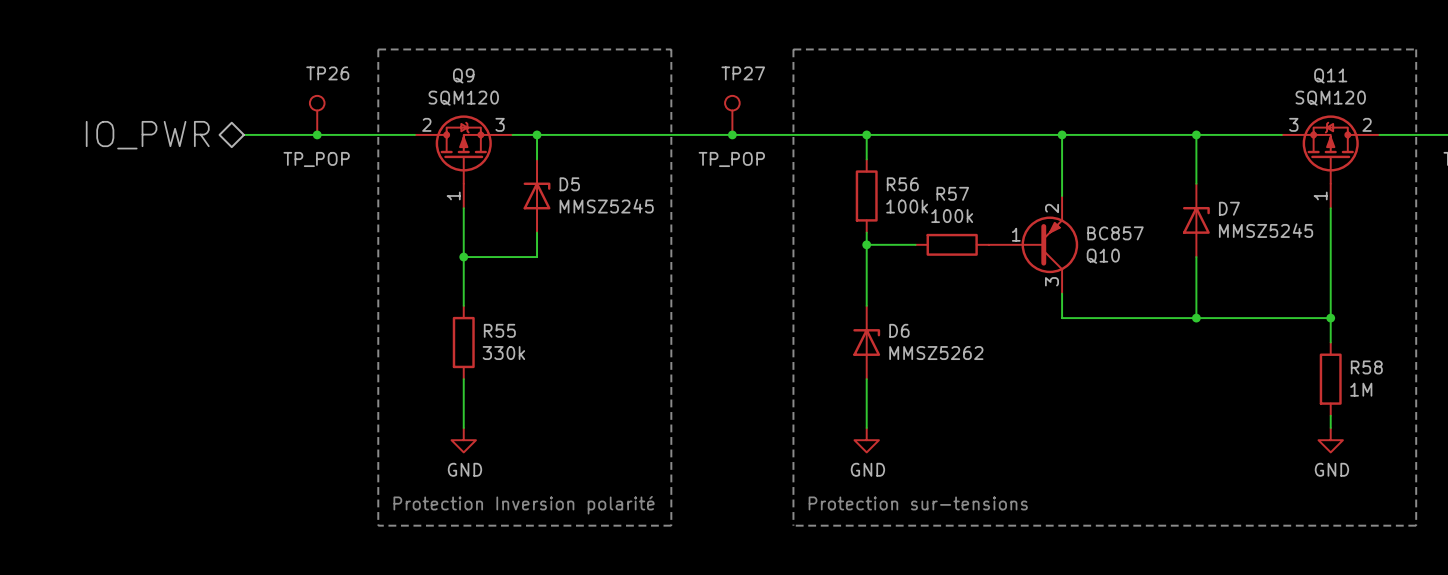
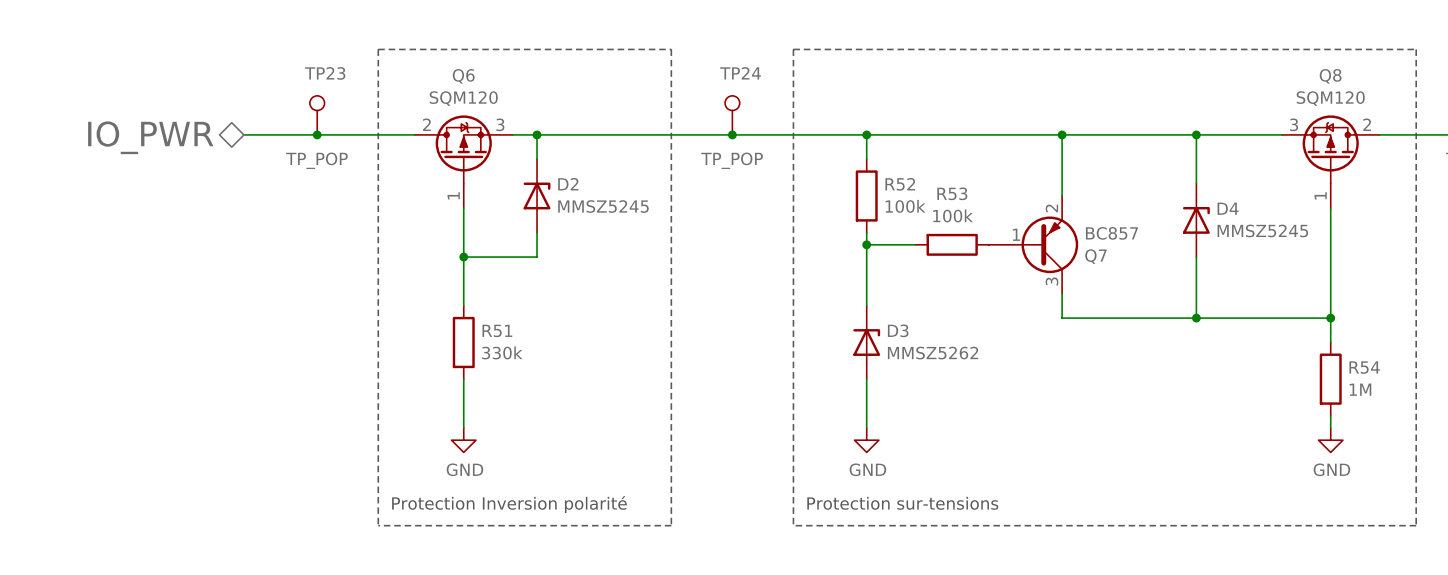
TP26 name: TP26 (327, 73) -> TP23 (325, 73)
TP27 name: TP27 (743, 73) -> TP24 (740, 73)
Q9 name: Q9 (463, 75) -> Q6 (463, 76)
Q11 name: Q11 (1330, 75) -> Q8 (1330, 76)
D5 name: D5 (569, 184) -> D2 (568, 184)
R56 name: R56 (902, 184) -> R52 (900, 184)
R57 name: R57 (952, 193) -> R53 (952, 193)
D7 name: D7 (1229, 208) -> D4 (1228, 208)
Q10 name: Q10 (1103, 256) -> Q7 (1095, 256)
R55 name: R55 (499, 330) -> R51 (497, 330)
D6 name: D6 (899, 330) -> D3 (898, 330)
R58 name: R58 (1366, 367) -> R54 (1364, 367)

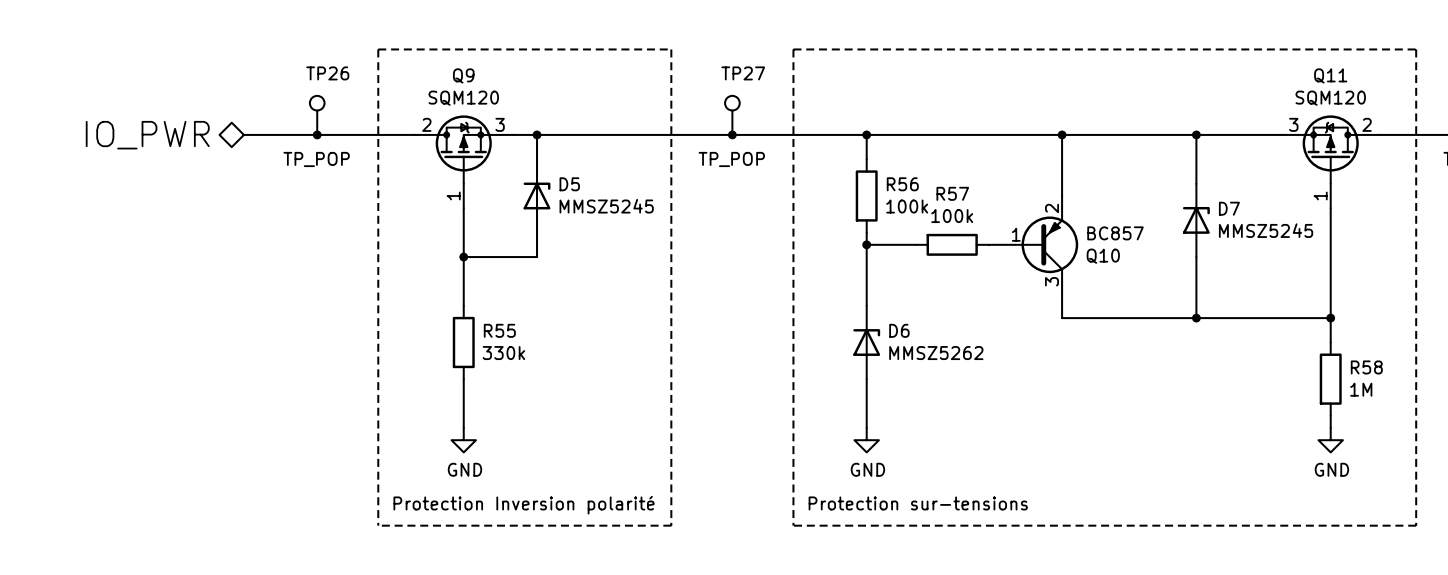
TP23 name: TP23 (325, 73) -> TP26 (327, 73)
TP24 name: TP24 (740, 73) -> TP27 (743, 73)
Q6 name: Q6 (463, 76) -> Q9 (463, 75)
Q8 name: Q8 (1330, 76) -> Q11 (1330, 75)
D2 name: D2 (568, 184) -> D5 (569, 184)
R52 name: R52 (900, 184) -> R56 (902, 184)
R53 name: R53 (952, 193) -> R57 (952, 193)
D4 name: D4 (1228, 208) -> D7 (1229, 208)
Q7 name: Q7 (1095, 256) -> Q10 (1103, 256)
R51 name: R51 (497, 330) -> R55 (499, 330)
D3 name: D3 (898, 330) -> D6 (899, 330)
R54 name: R54 (1364, 367) -> R58 (1366, 367)

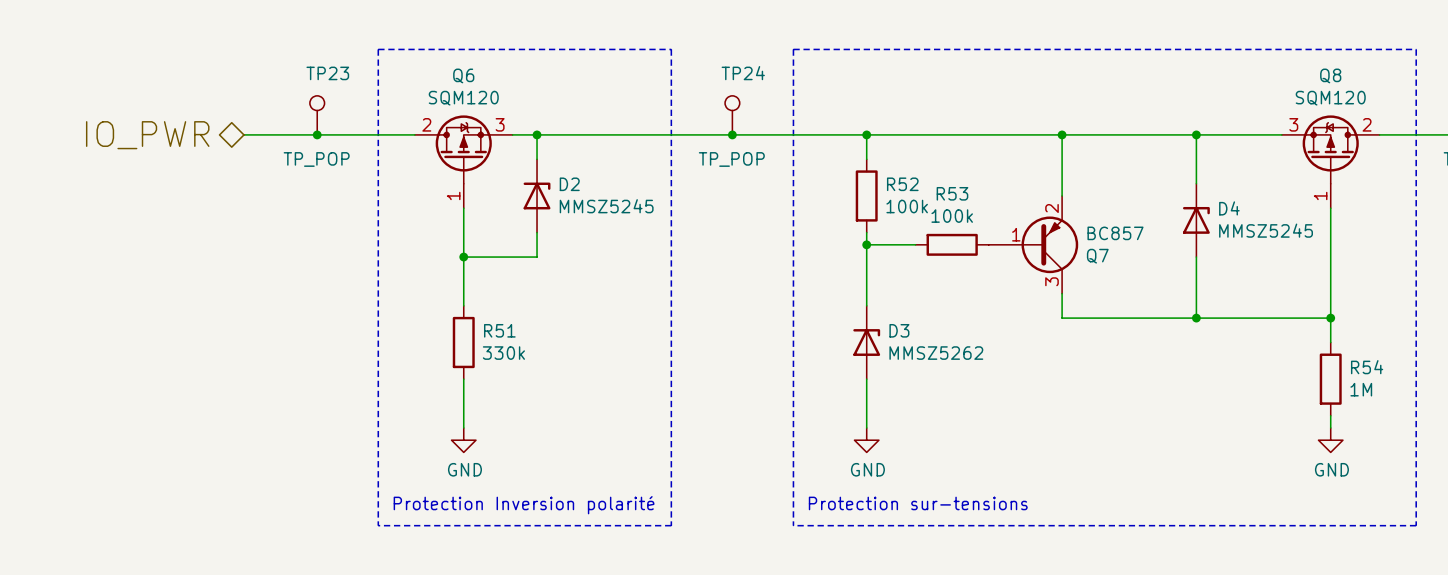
TP26 name: TP26 (327, 73) -> TP23 (327, 73)
TP27 name: TP27 (743, 73) -> TP24 (743, 73)
Q9 name: Q9 (463, 75) -> Q6 (463, 75)
Q11 name: Q11 (1330, 75) -> Q8 (1330, 75)
D5 name: D5 (569, 184) -> D2 (569, 184)
R56 name: R56 (902, 184) -> R52 (902, 184)
R57 name: R57 (952, 193) -> R53 (952, 193)
D7 name: D7 (1229, 208) -> D4 (1229, 208)
Q10 name: Q10 (1103, 256) -> Q7 (1097, 256)
R55 name: R55 (499, 330) -> R51 (499, 330)
D6 name: D6 (899, 330) -> D3 (899, 330)
R58 name: R58 (1366, 367) -> R54 (1367, 367)

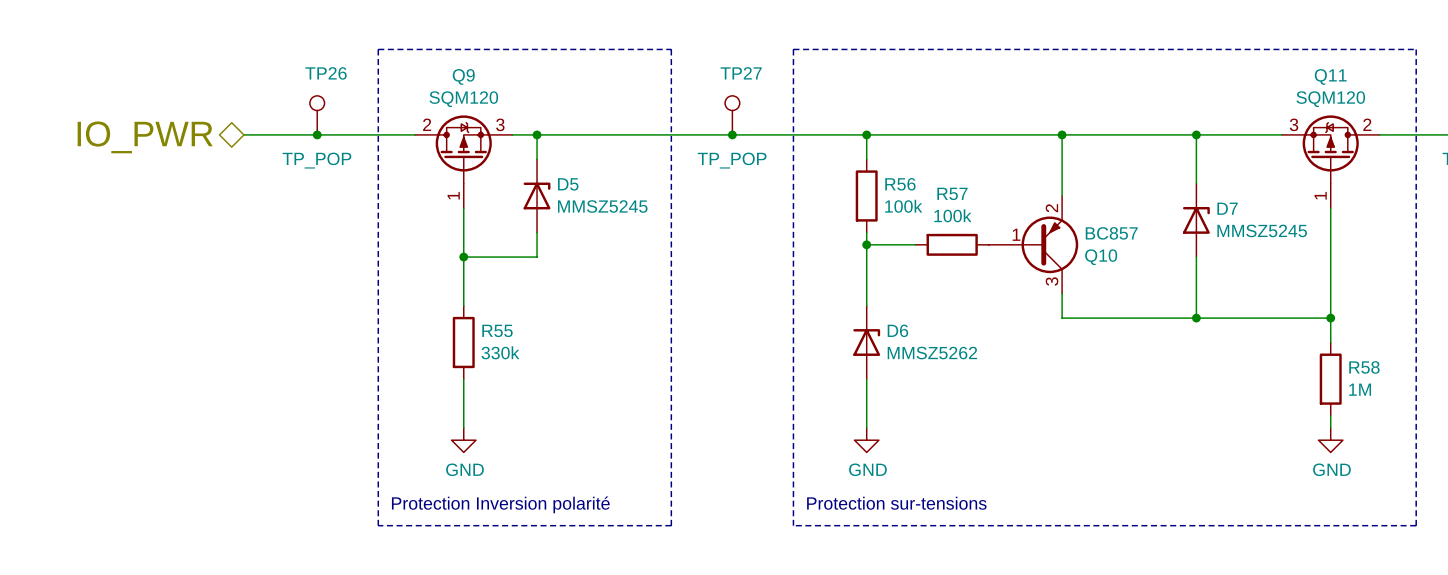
TP23 name: TP23 (327, 73) -> TP26 (326, 73)
TP24 name: TP24 (743, 73) -> TP27 (741, 73)
Q6 name: Q6 (463, 75) -> Q9 (463, 76)
Q8 name: Q8 (1330, 75) -> Q11 (1330, 76)
D2 name: D2 (569, 184) -> D5 (568, 184)
R52 name: R52 (902, 184) -> R56 (900, 184)
R53 name: R53 (952, 193) -> R57 (952, 193)
D4 name: D4 (1229, 208) -> D7 (1227, 208)
Q7 name: Q7 (1097, 256) -> Q10 (1101, 257)
R51 name: R51 (499, 330) -> R55 (497, 330)
D3 name: D3 (899, 330) -> D6 (897, 330)
R54 name: R54 (1367, 367) -> R58 (1364, 367)

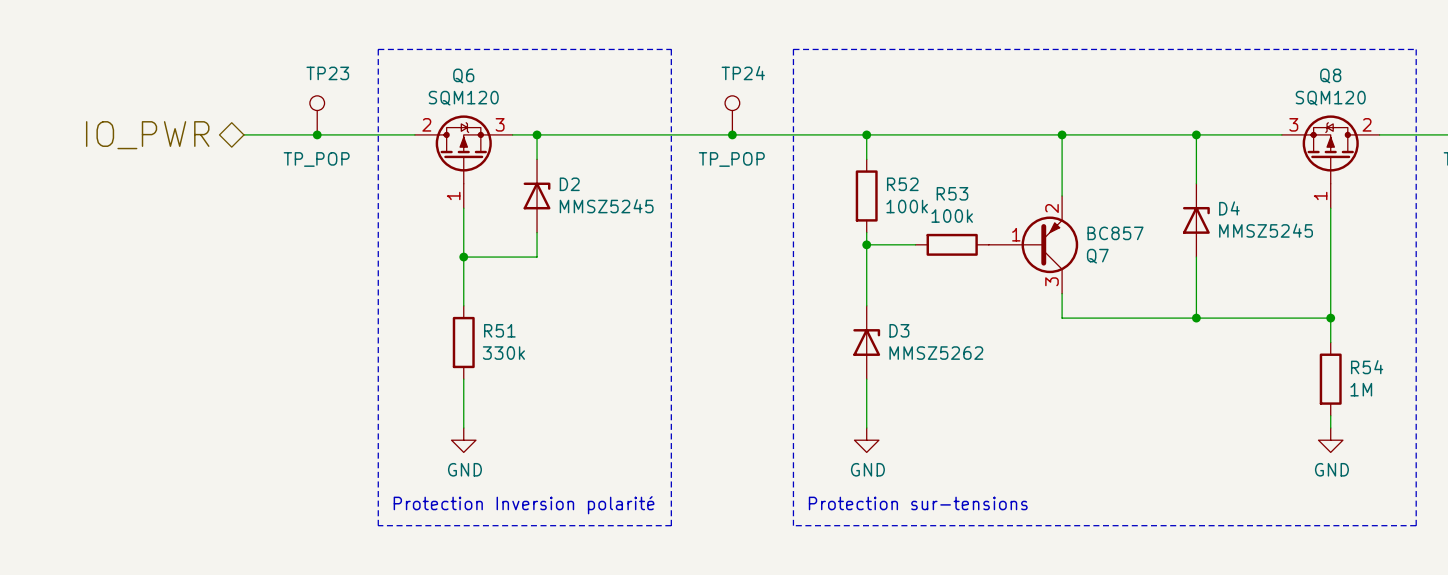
TP26 name: TP26 (326, 73) -> TP23 (327, 73)
TP27 name: TP27 (741, 73) -> TP24 (743, 73)
Q9 name: Q9 (463, 76) -> Q6 (463, 75)
Q11 name: Q11 (1330, 76) -> Q8 (1330, 75)
D5 name: D5 (568, 184) -> D2 (569, 184)
R56 name: R56 (900, 184) -> R52 (902, 184)
R57 name: R57 (952, 193) -> R53 (952, 193)
D7 name: D7 (1227, 208) -> D4 (1229, 208)
Q10 name: Q10 (1101, 257) -> Q7 (1097, 256)
R55 name: R55 (497, 330) -> R51 (499, 330)
D6 name: D6 (897, 330) -> D3 (899, 330)
R58 name: R58 (1364, 367) -> R54 (1367, 367)

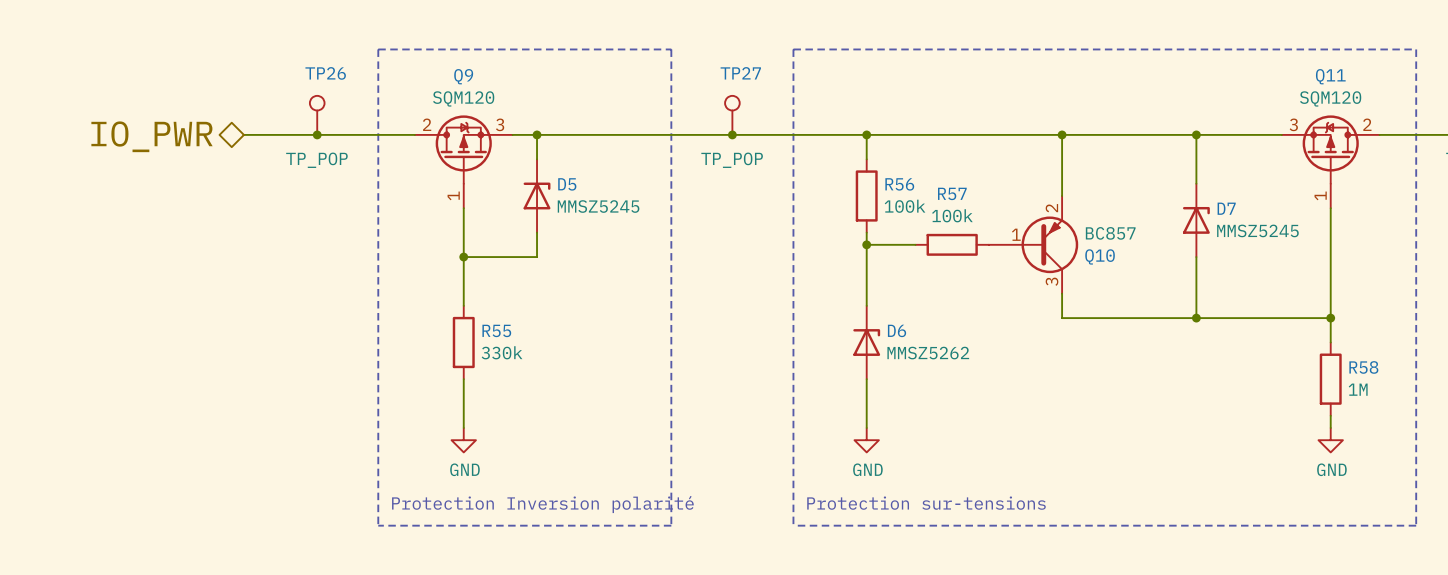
TP23 name: TP23 (327, 73) -> TP26 (325, 73)
TP24 name: TP24 (743, 73) -> TP27 (740, 73)
Q6 name: Q6 (463, 75) -> Q9 (463, 76)
Q8 name: Q8 (1330, 75) -> Q11 (1330, 76)
D2 name: D2 (569, 184) -> D5 (567, 184)
R52 name: R52 (902, 184) -> R56 (899, 184)
R53 name: R53 (952, 193) -> R57 (952, 193)
D4 name: D4 (1229, 208) -> D7 (1226, 208)
Q7 name: Q7 (1097, 256) -> Q10 (1100, 256)
R51 name: R51 (499, 330) -> R55 (496, 330)
D3 name: D3 (899, 330) -> D6 (897, 330)
R54 name: R54 (1367, 367) -> R58 (1363, 367)

